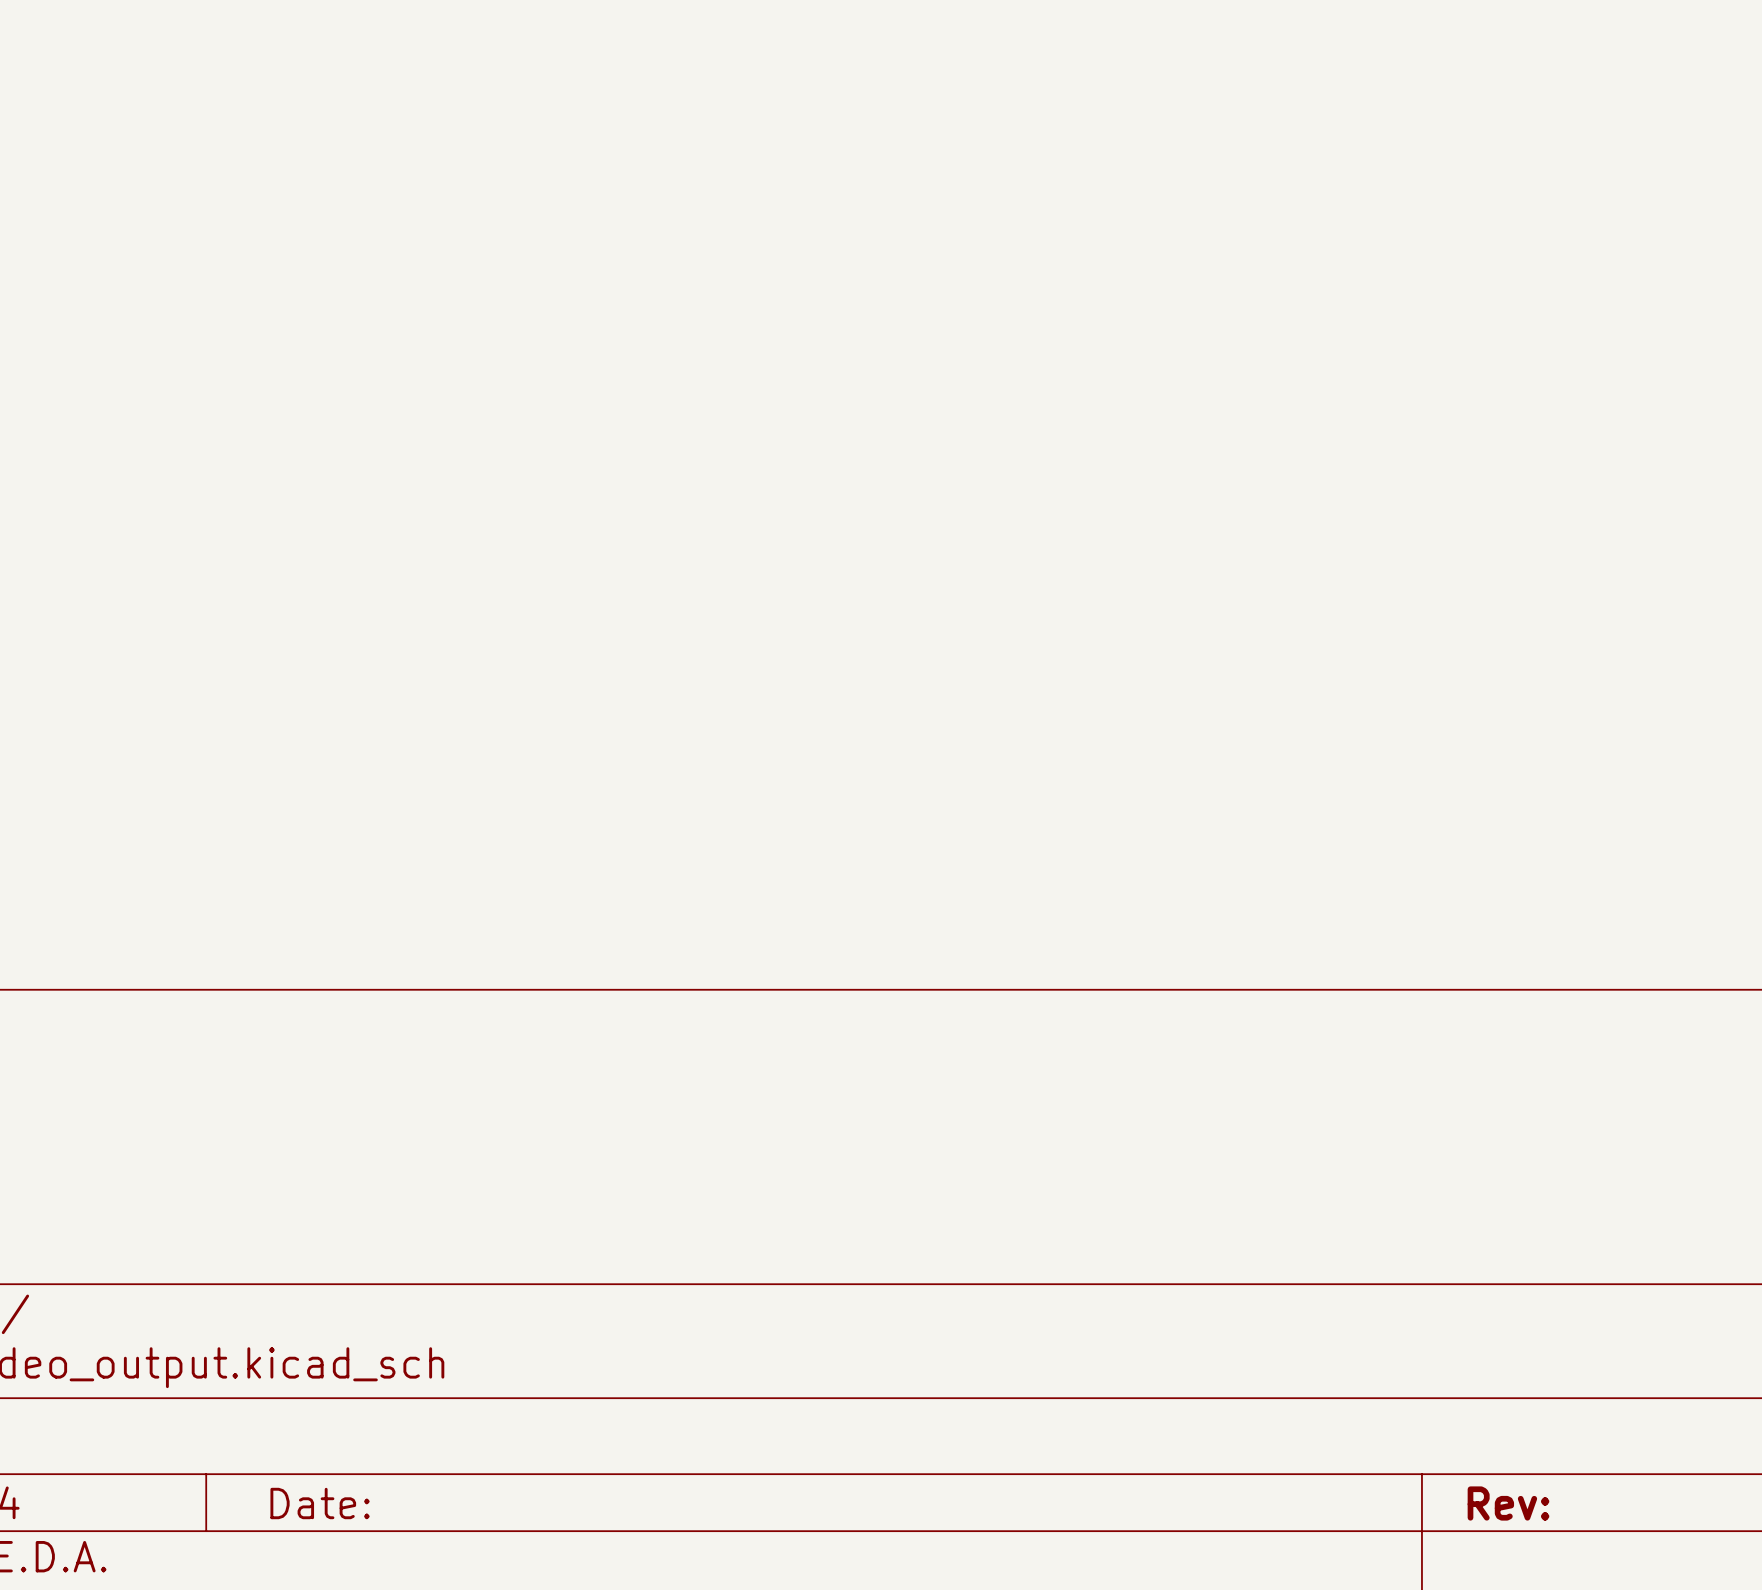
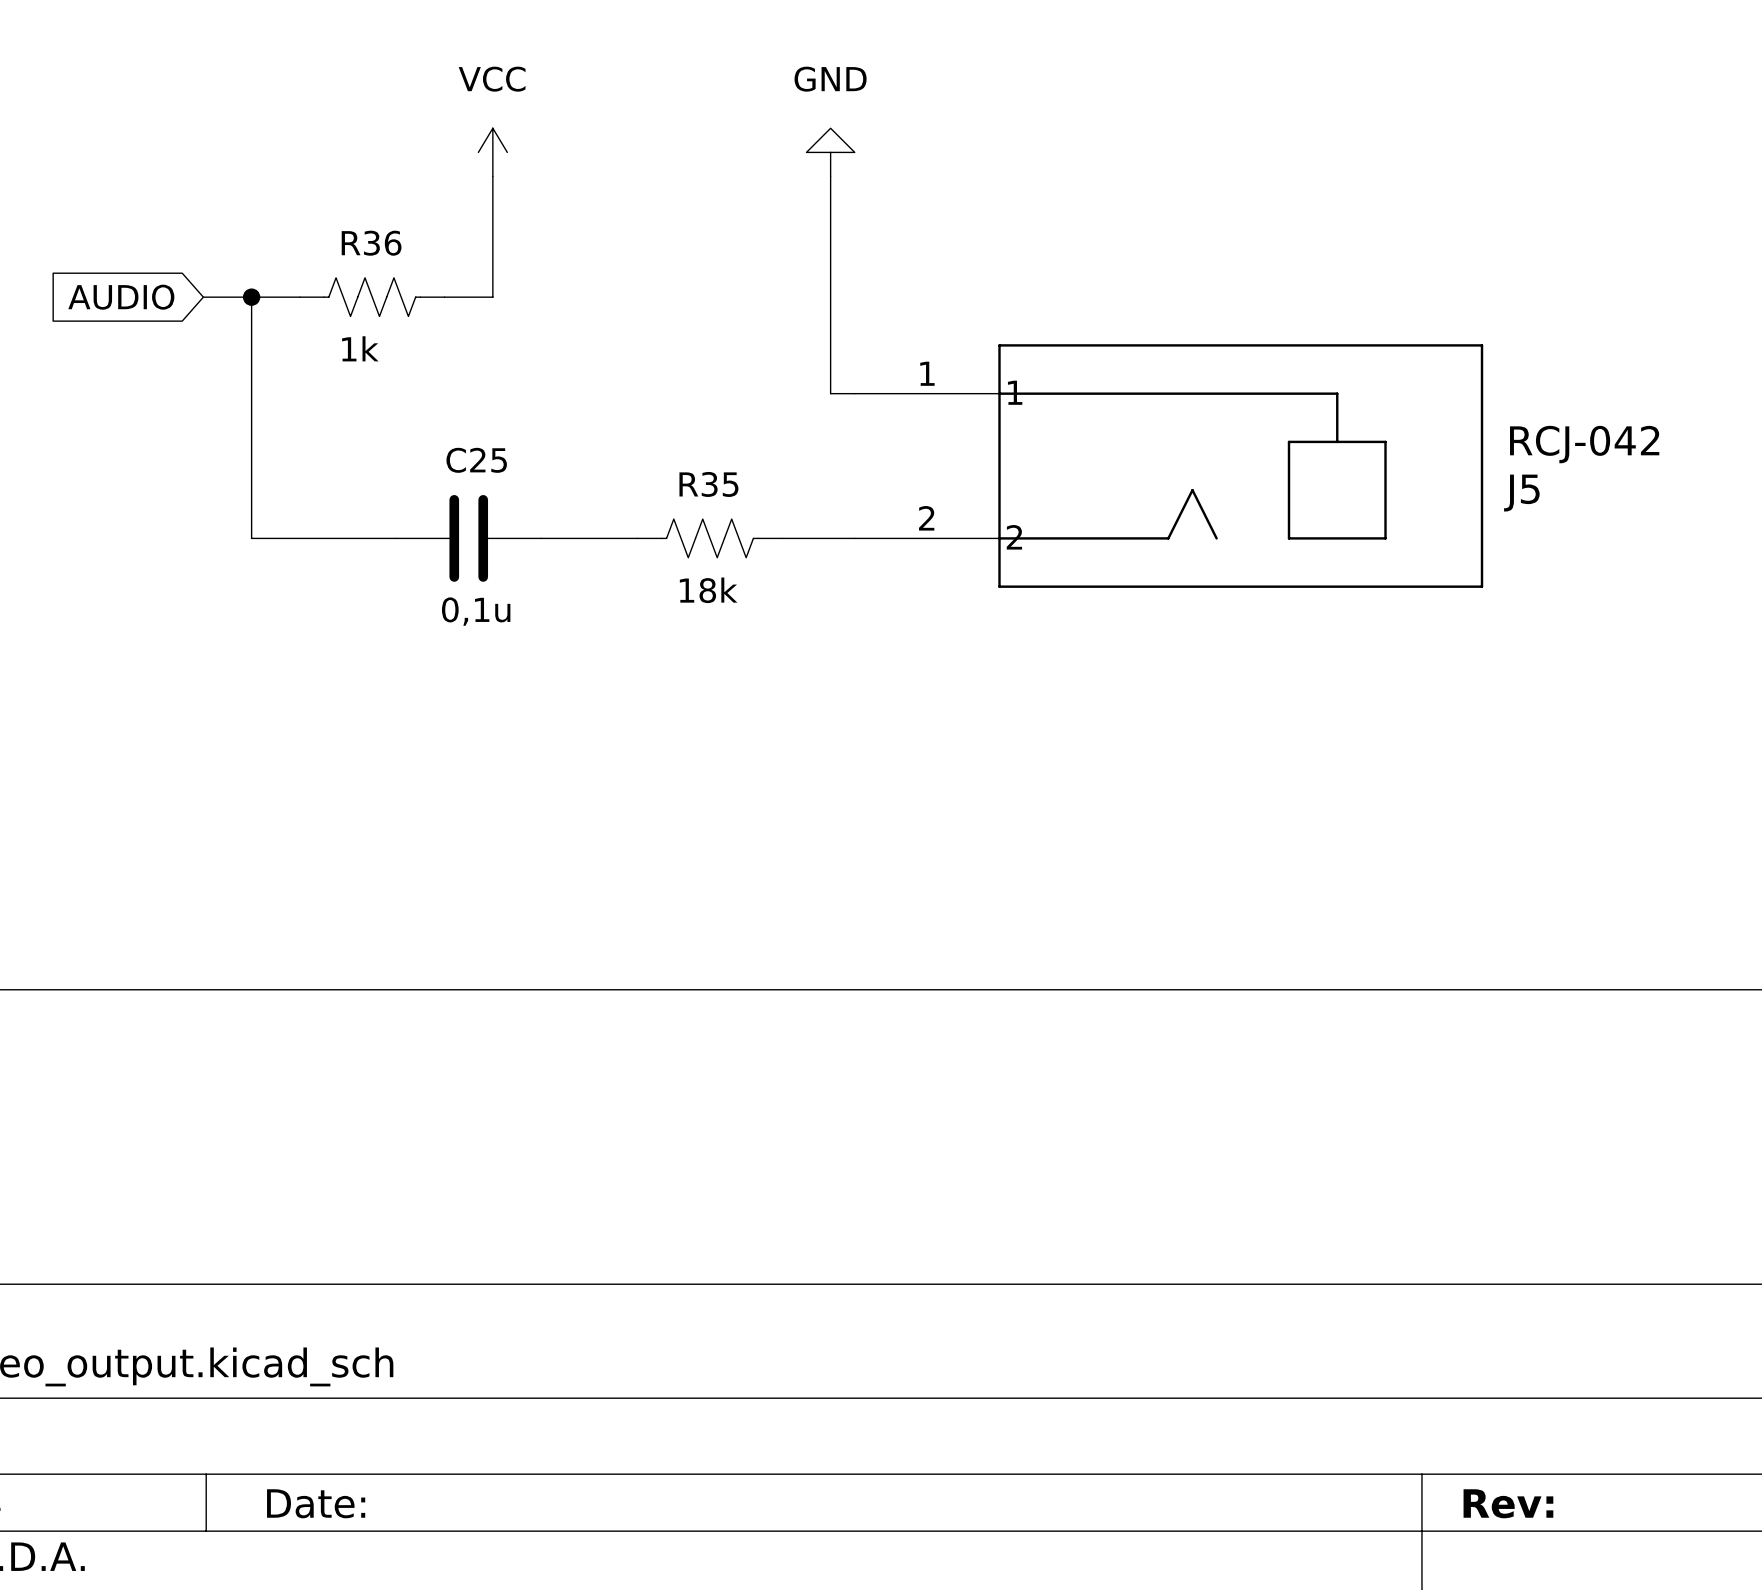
power symbol: none -> VCC (492, 152)
power symbol: none -> GND (830, 152)
wire: none -> (492, 176) (492, 297) (444, 297)
wire: none -> (830, 176) (830, 393) (854, 393)
global label: none -> AUDIO (121, 297)
wire: none -> (203, 297) (299, 297)
wire: none -> (251, 297) (251, 538) (396, 538)
junction: none -> (251, 297)
R36: none -> 1k (372, 297)
J5: none -> RCJ-042 (1168, 466)
C25: none -> 0,1u (468, 538)
wire: none -> (541, 538) (637, 538)
R35: none -> 18k (709, 538)
wire: none -> (782, 538) (854, 538)

